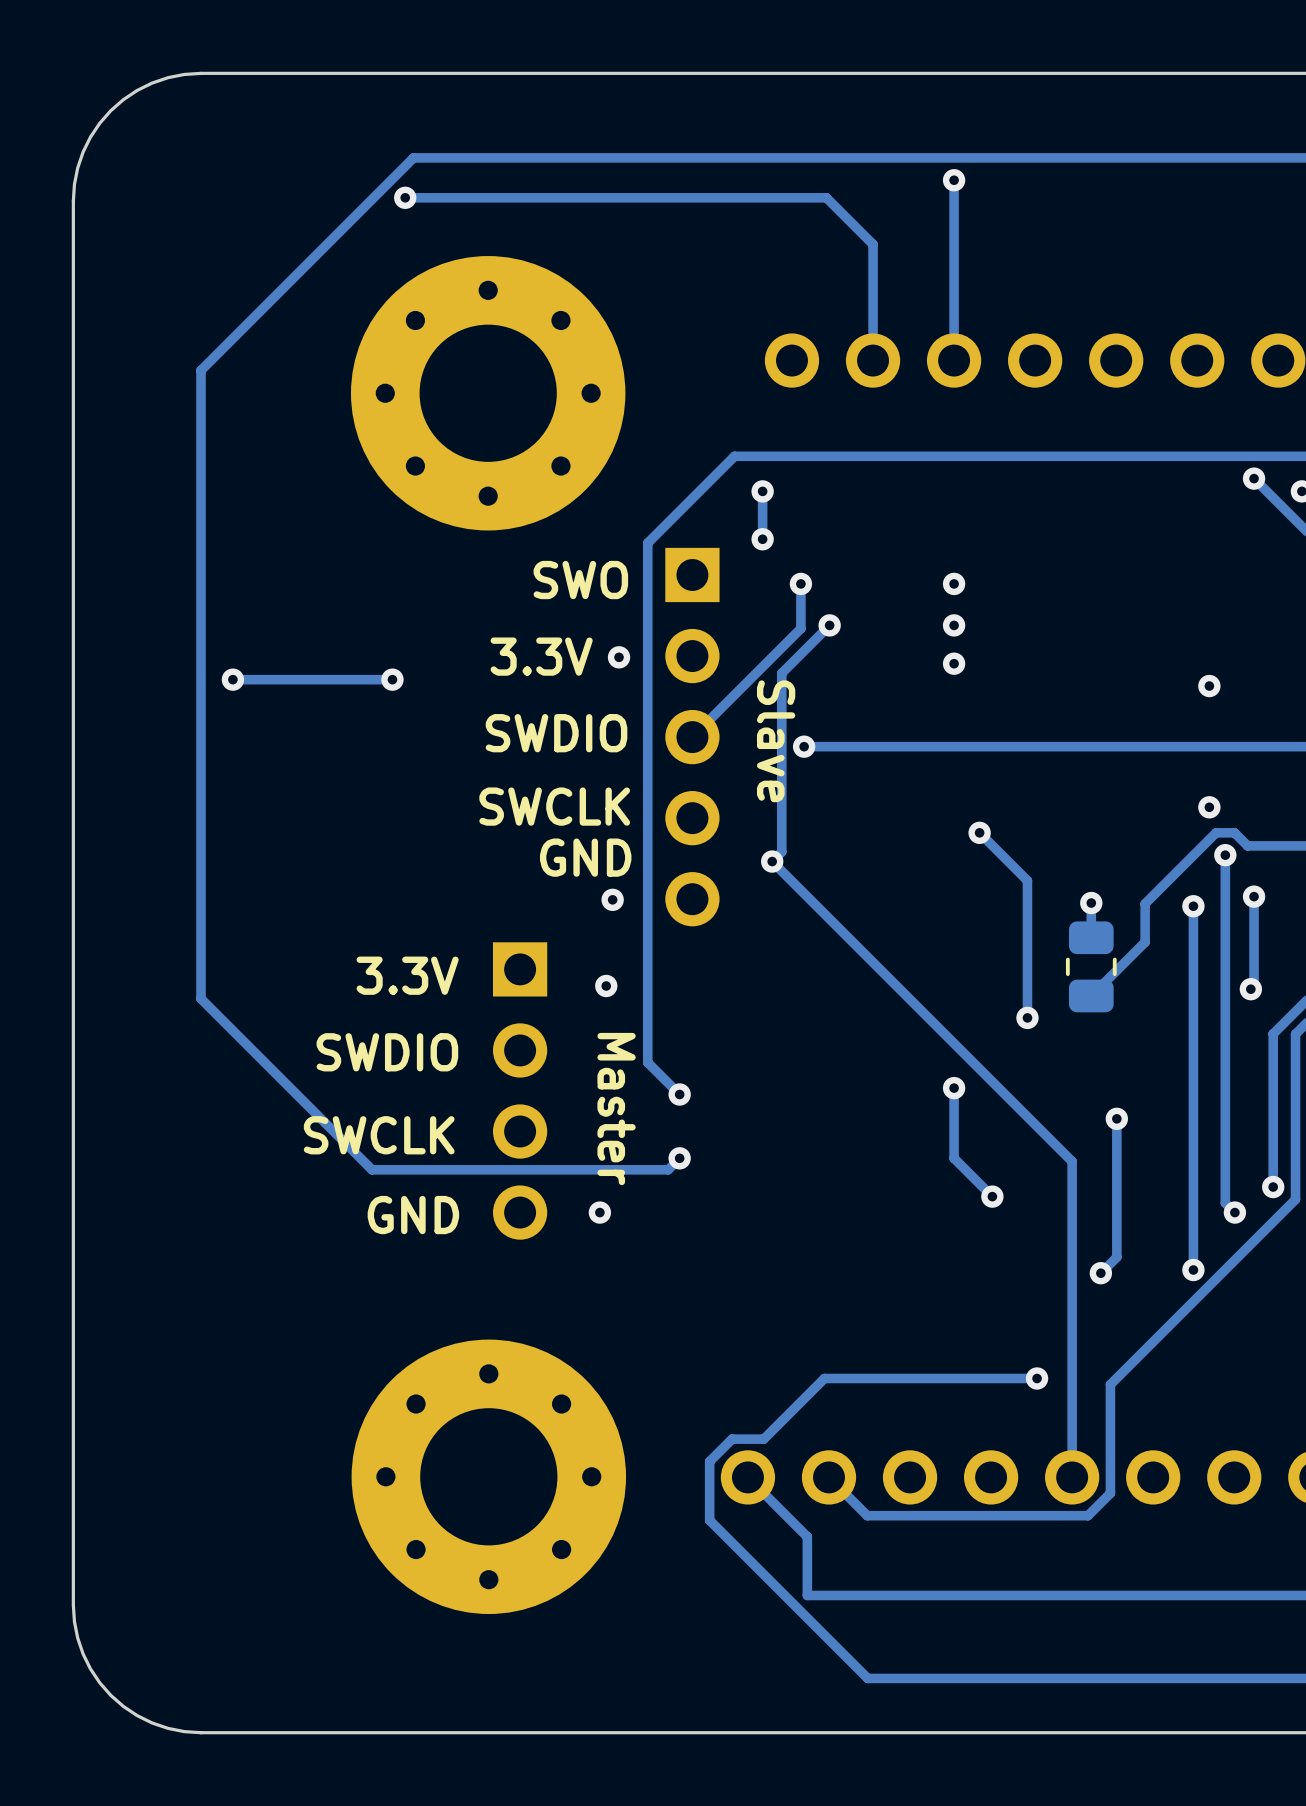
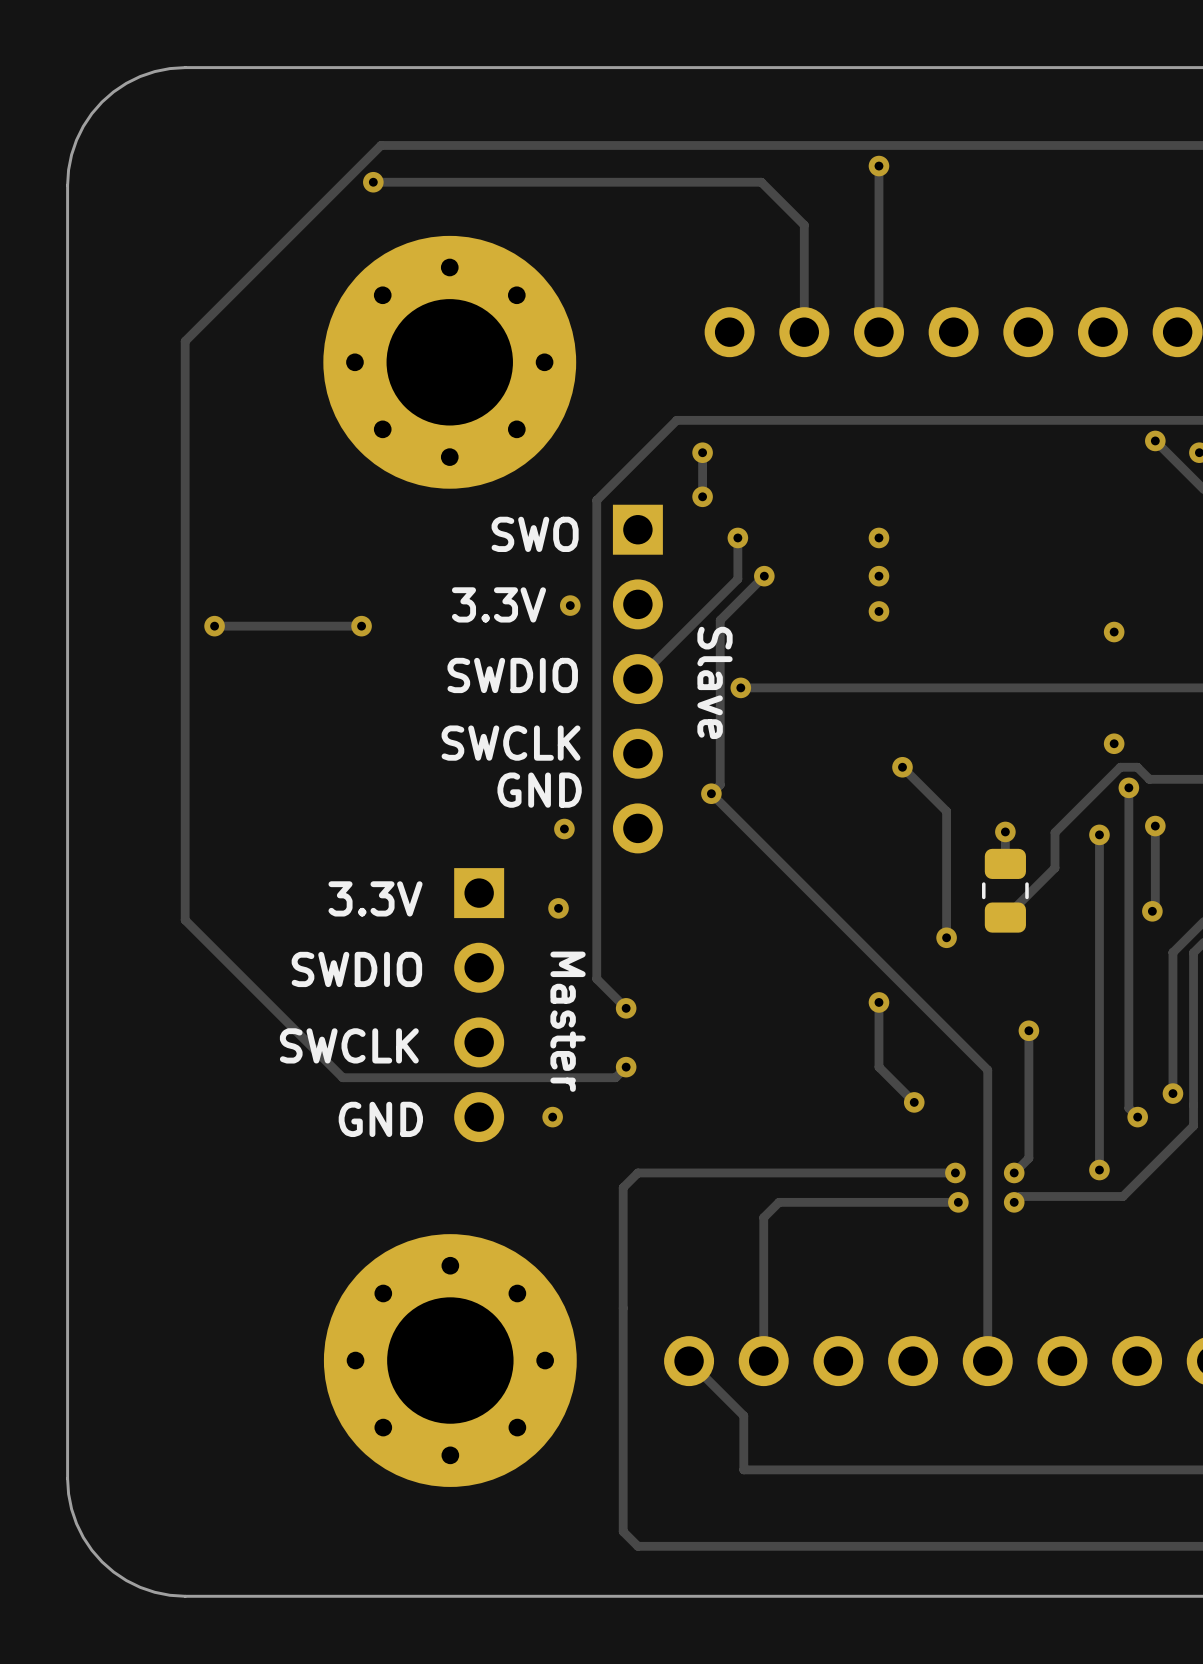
track: (1295, 1199) (1110, 1384) (1110, 1493) (1088, 1515) (867, 1515) (829, 1477) -> (958, 1202) (779, 1202) (763, 1217) (763, 1361)
track: none -> (1193, 1105) (1193, 1125) (1122, 1196) (1020, 1196) (1014, 1202)
via: none -> (955, 1172)
via: none -> (958, 1202)
via: none -> (1014, 1202)
track: (1037, 1378) (824, 1378) (763, 1439) (732, 1439) (709, 1461) (709, 1520) (867, 1678) -> (955, 1172) (637, 1172) (623, 1187) (623, 1531) (637, 1546) (799, 1546)
via: (1037, 1378) -> none

